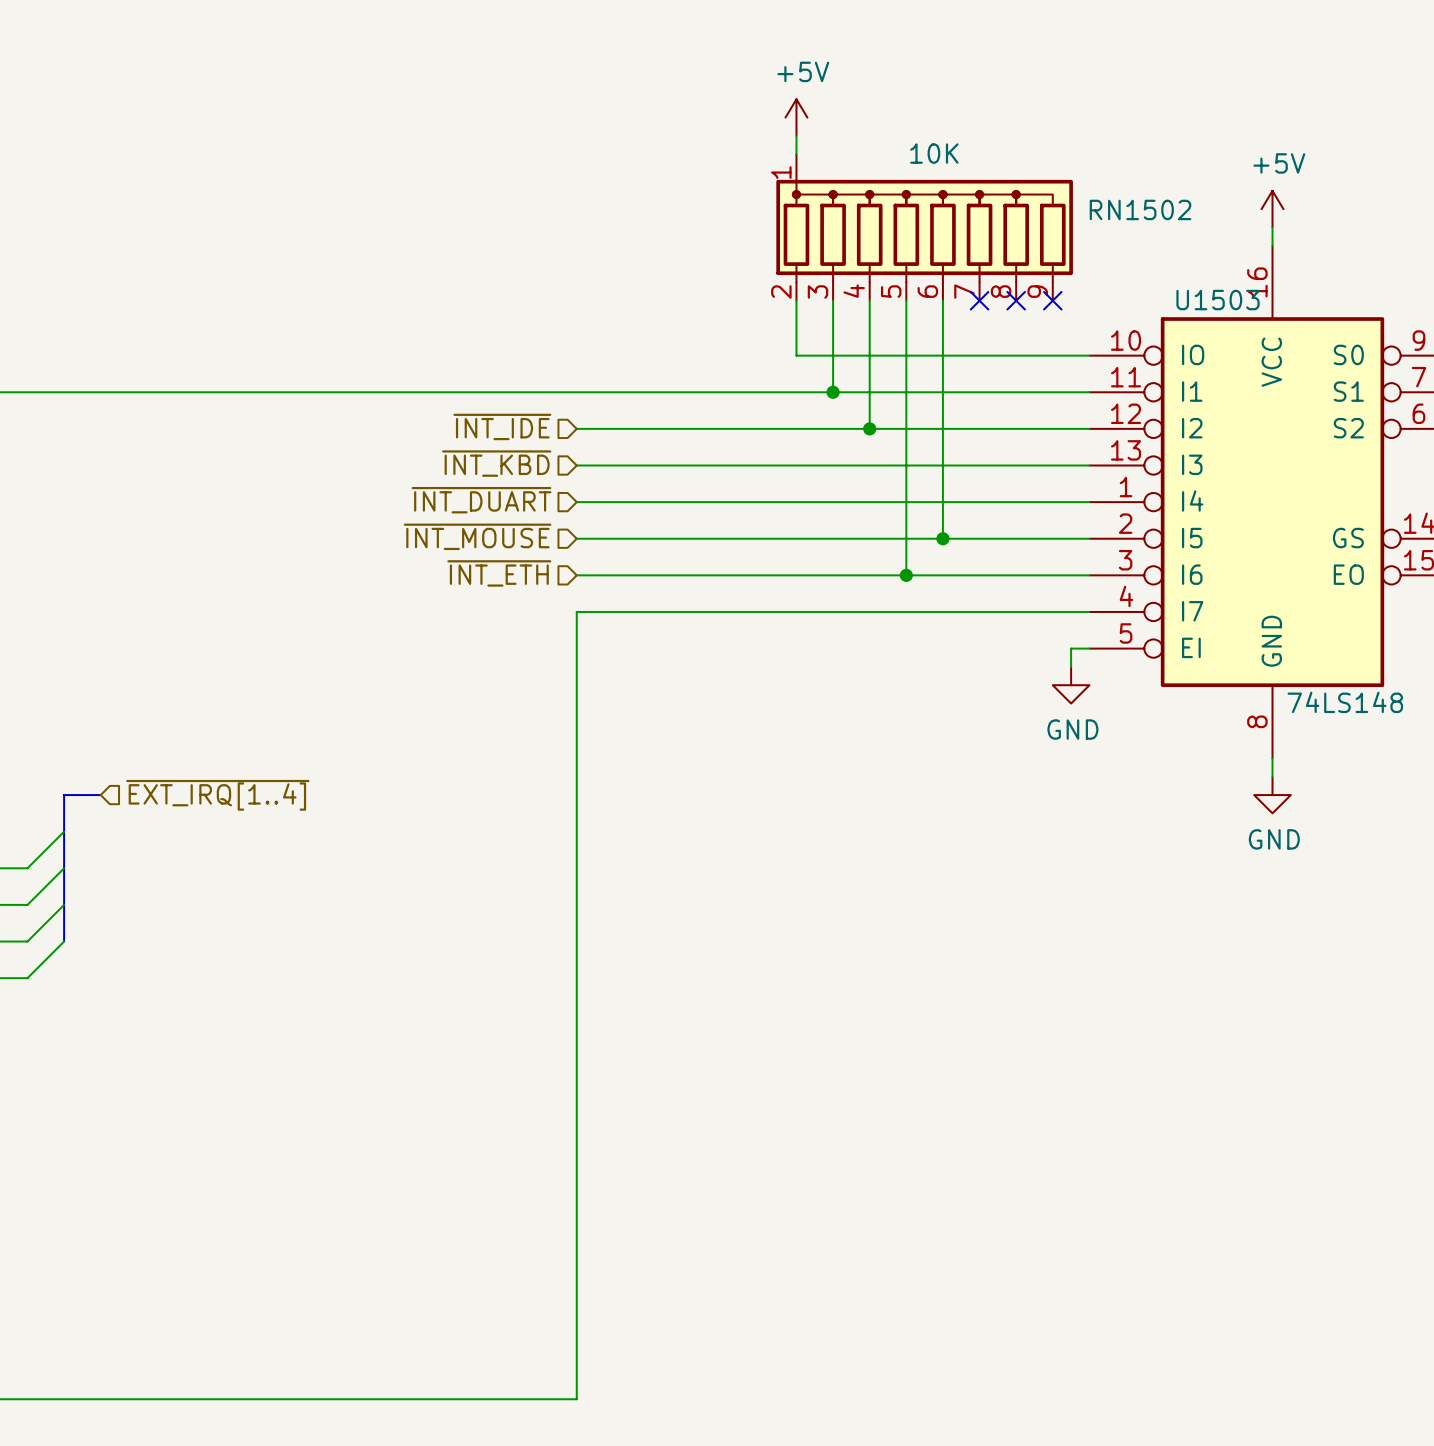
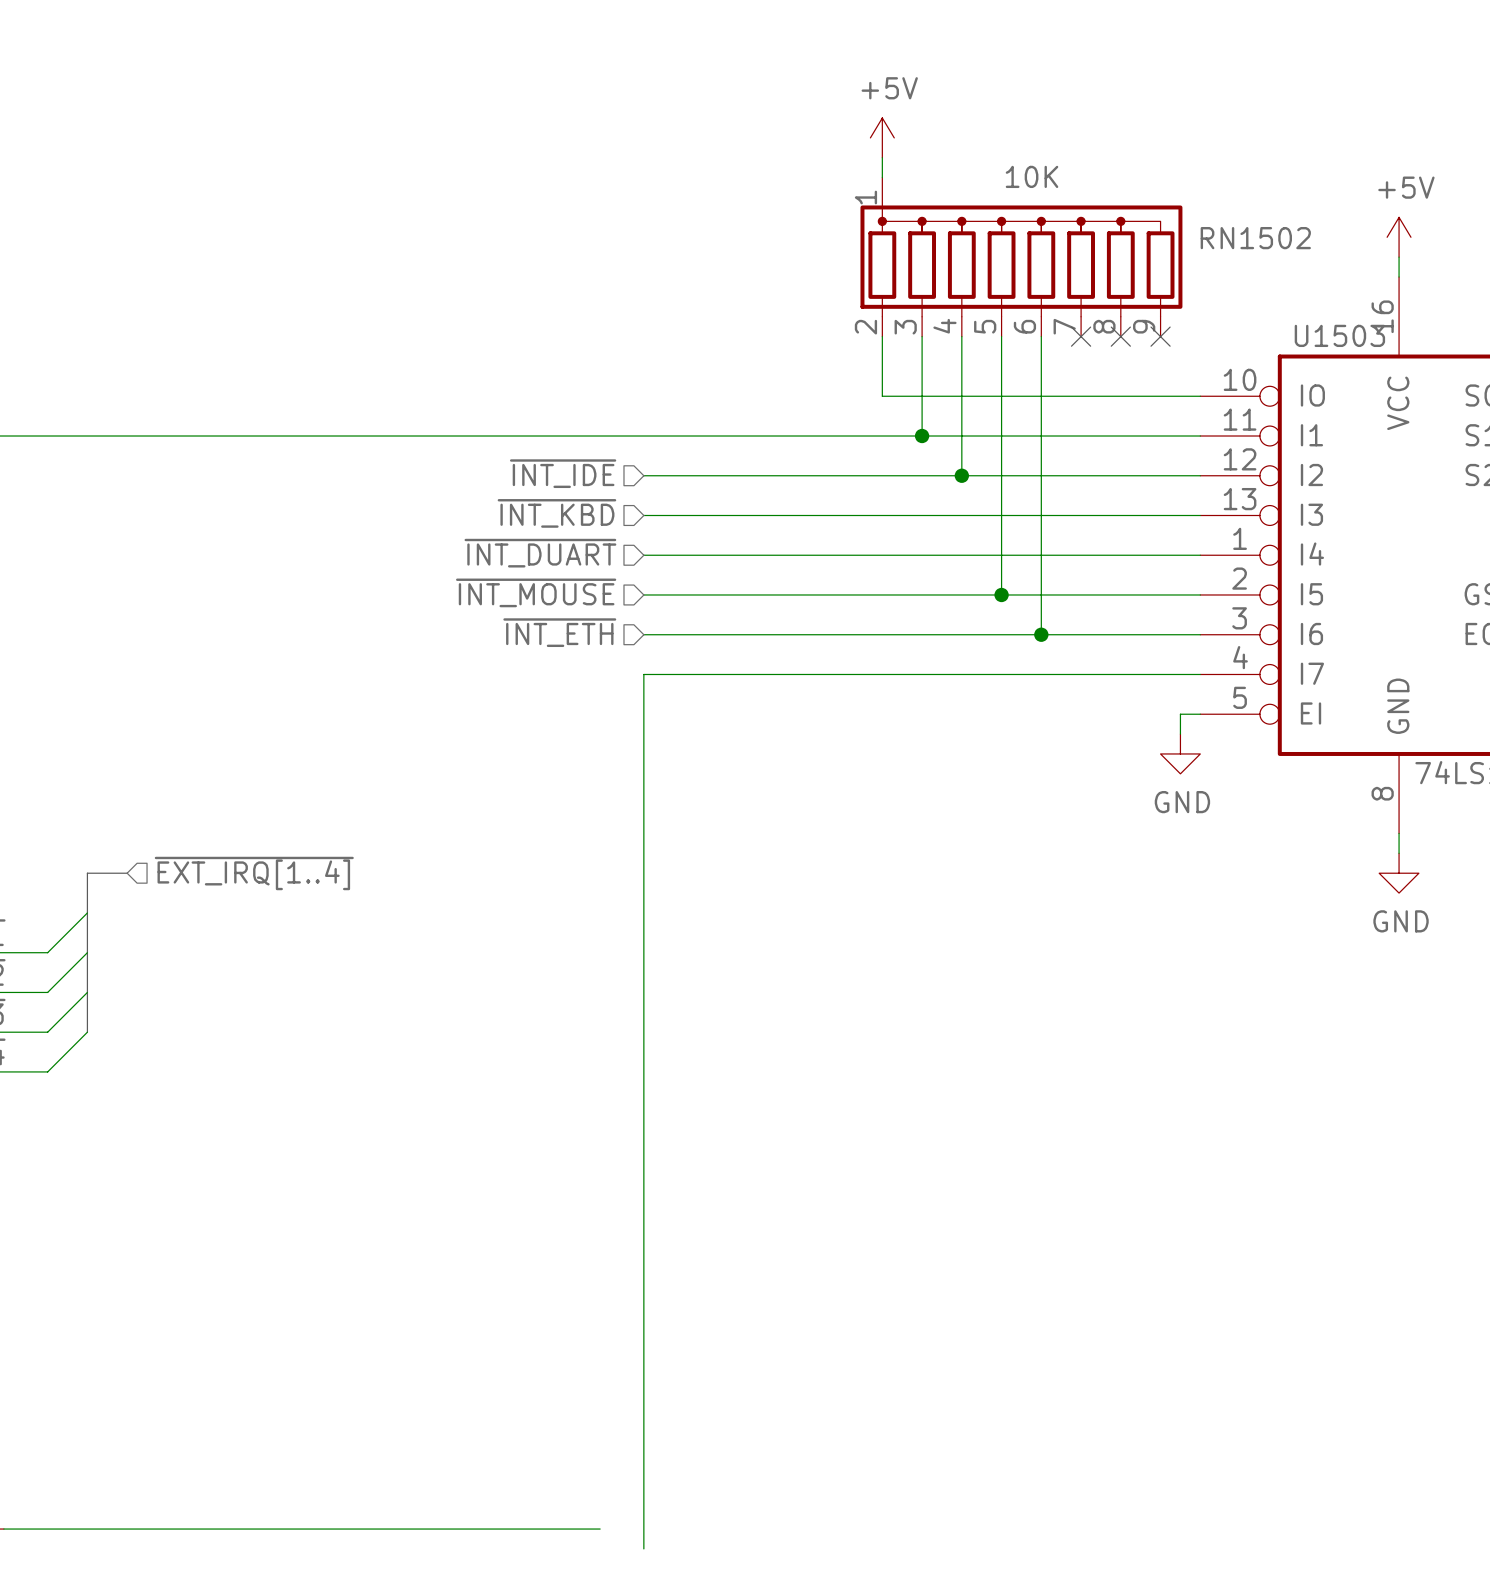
wire: (906, 538) (906, 575) -> (1041, 594) (1041, 634)
junction: none -> (1001, 594)
junction: (942, 538) -> none
junction: (906, 575) -> none
junction: none -> (1041, 634)
wire: (536, 1399) (576, 1399) -> (643, 1548) (643, 1529)

